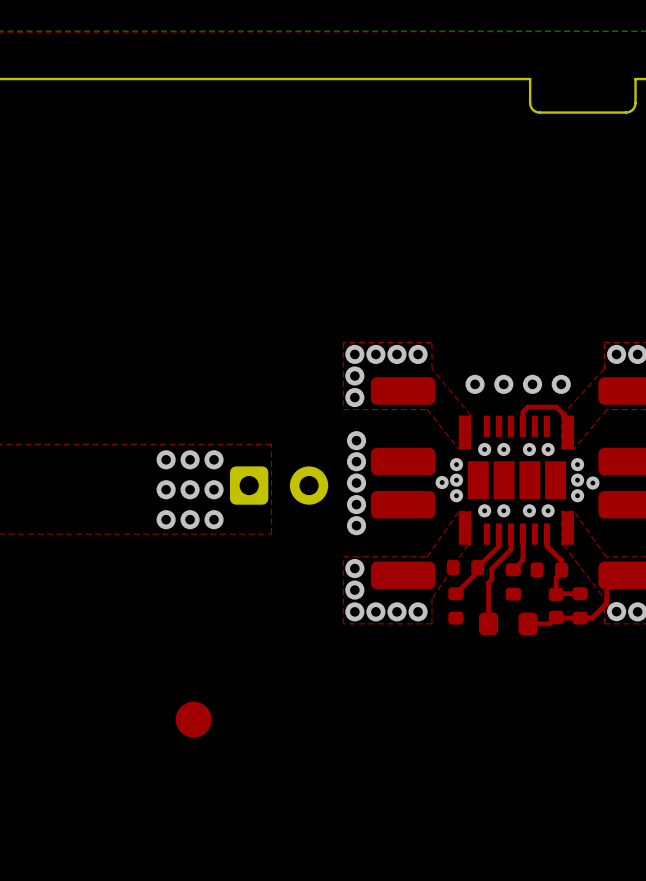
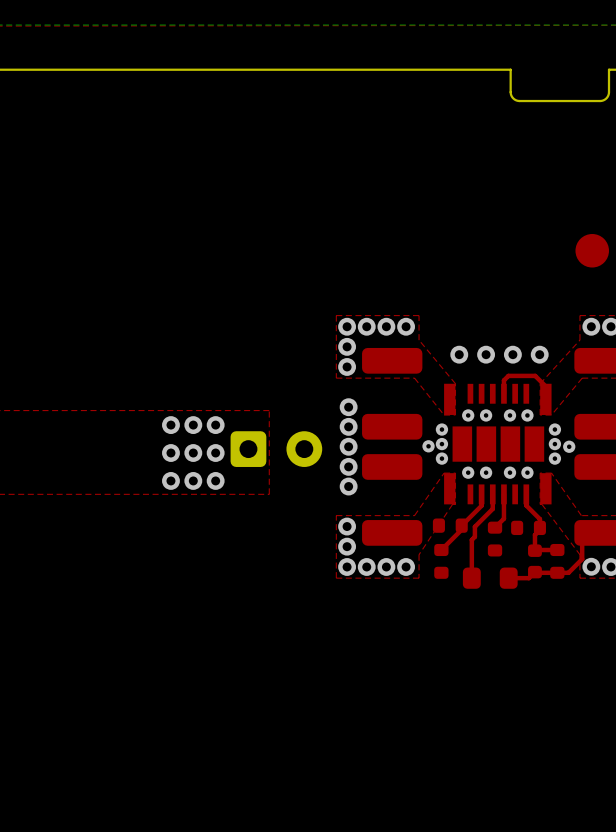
part: none -> (592, 250)
part: (193, 719) -> none

